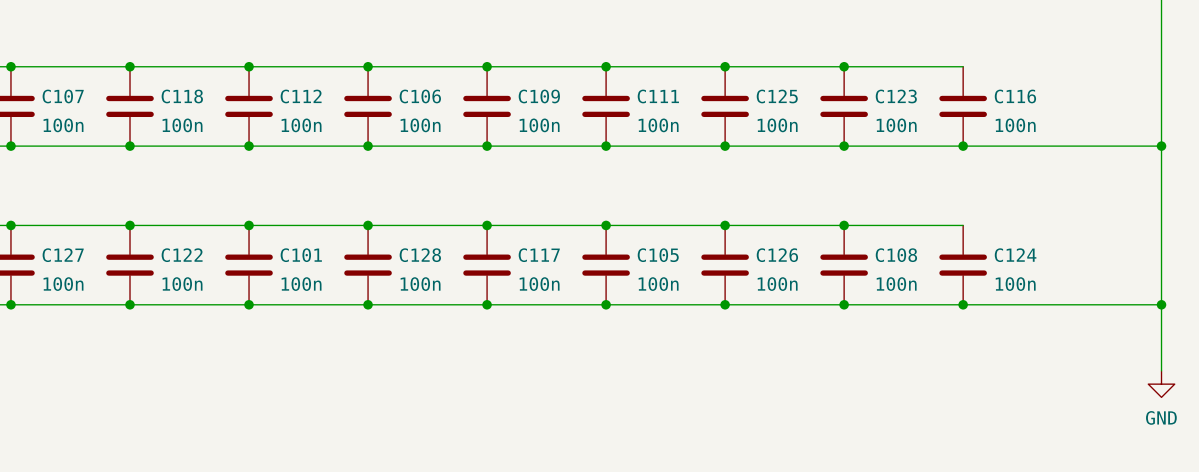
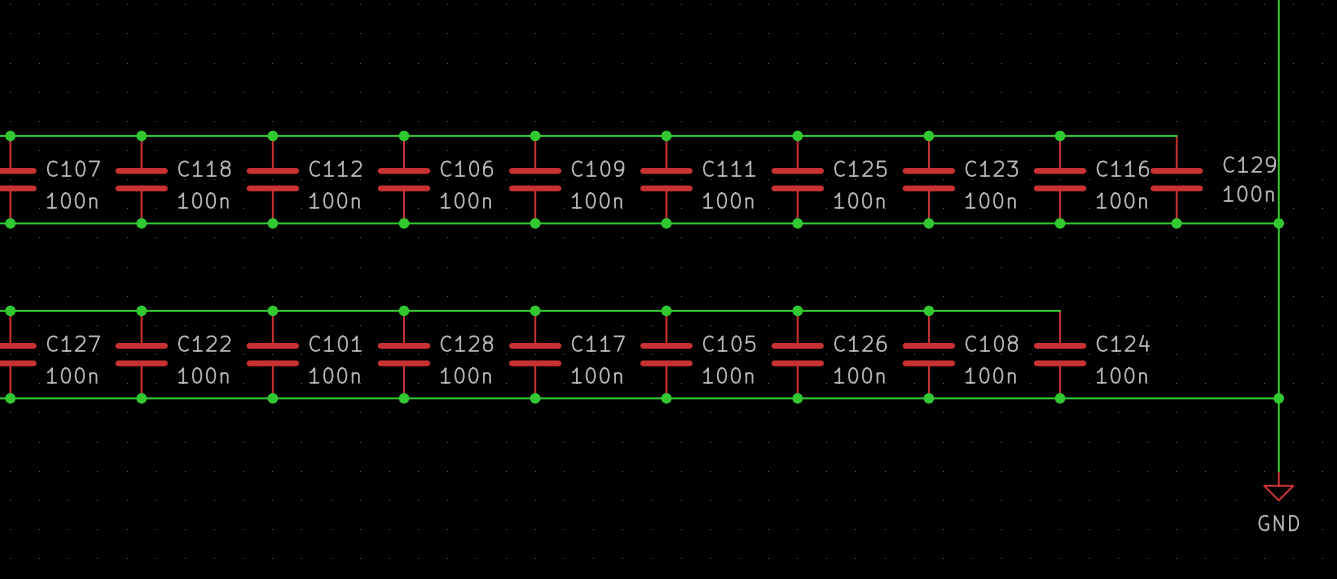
wire: none -> (1060, 135) (1176, 135)
junction: none -> (1060, 135)
C129: none -> 100n (1176, 179)
junction: none -> (1176, 223)

